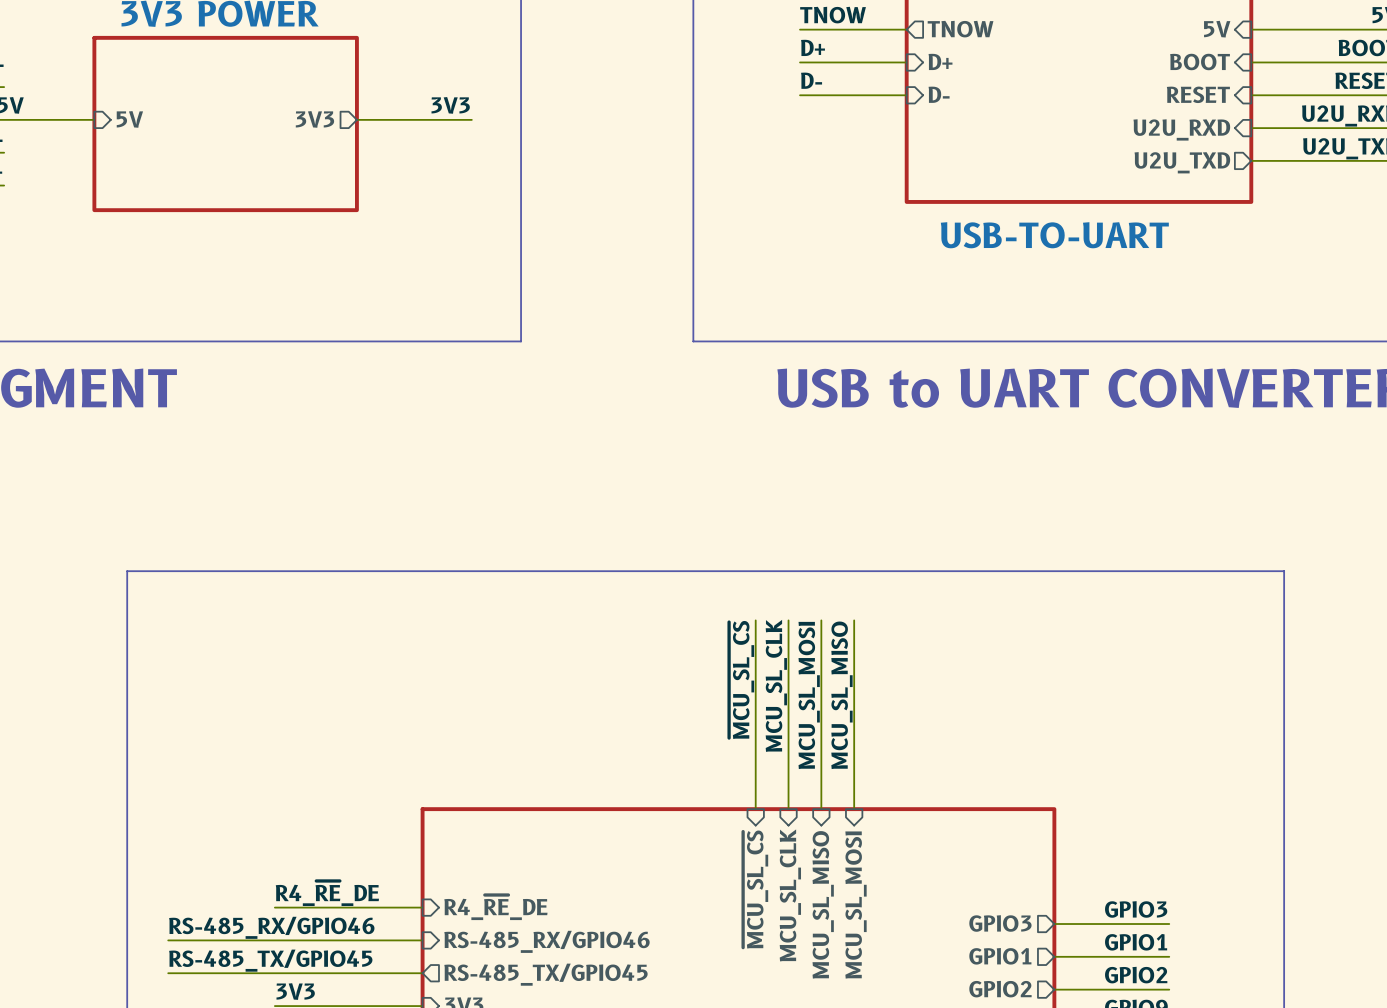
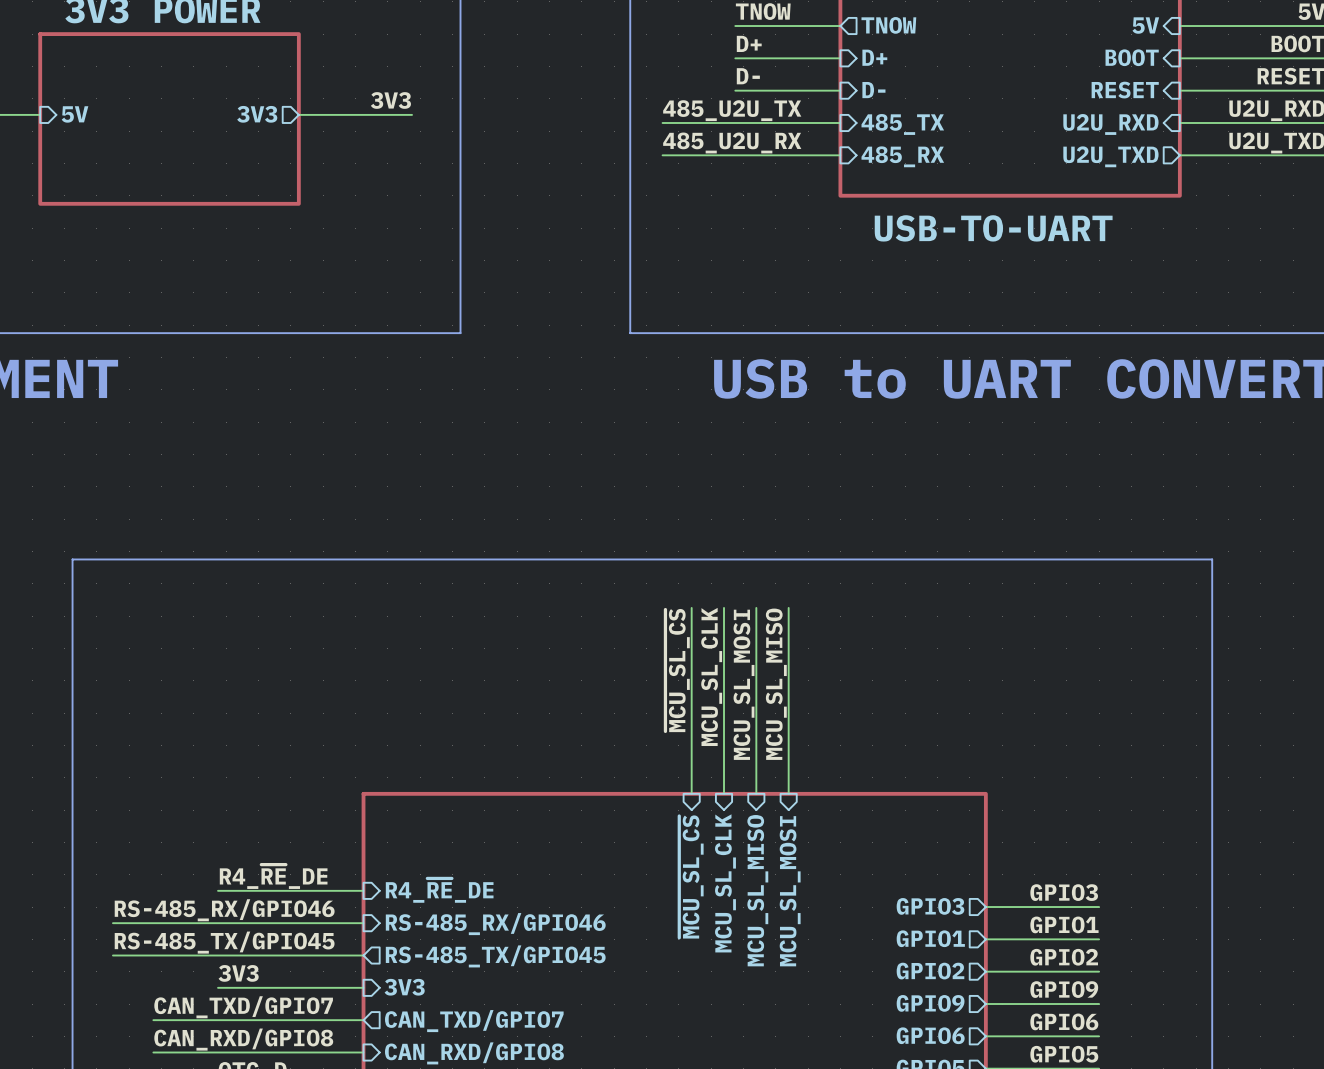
label: none -> 485_U2U_TX (732, 110)
wire: none -> (662, 122) (840, 122)
sheet pin: none -> 485_TX (902, 124)
label: none -> 485_U2U_RX (732, 142)
wire: none -> (662, 155) (840, 155)
sheet pin: none -> 485_RX (902, 156)

